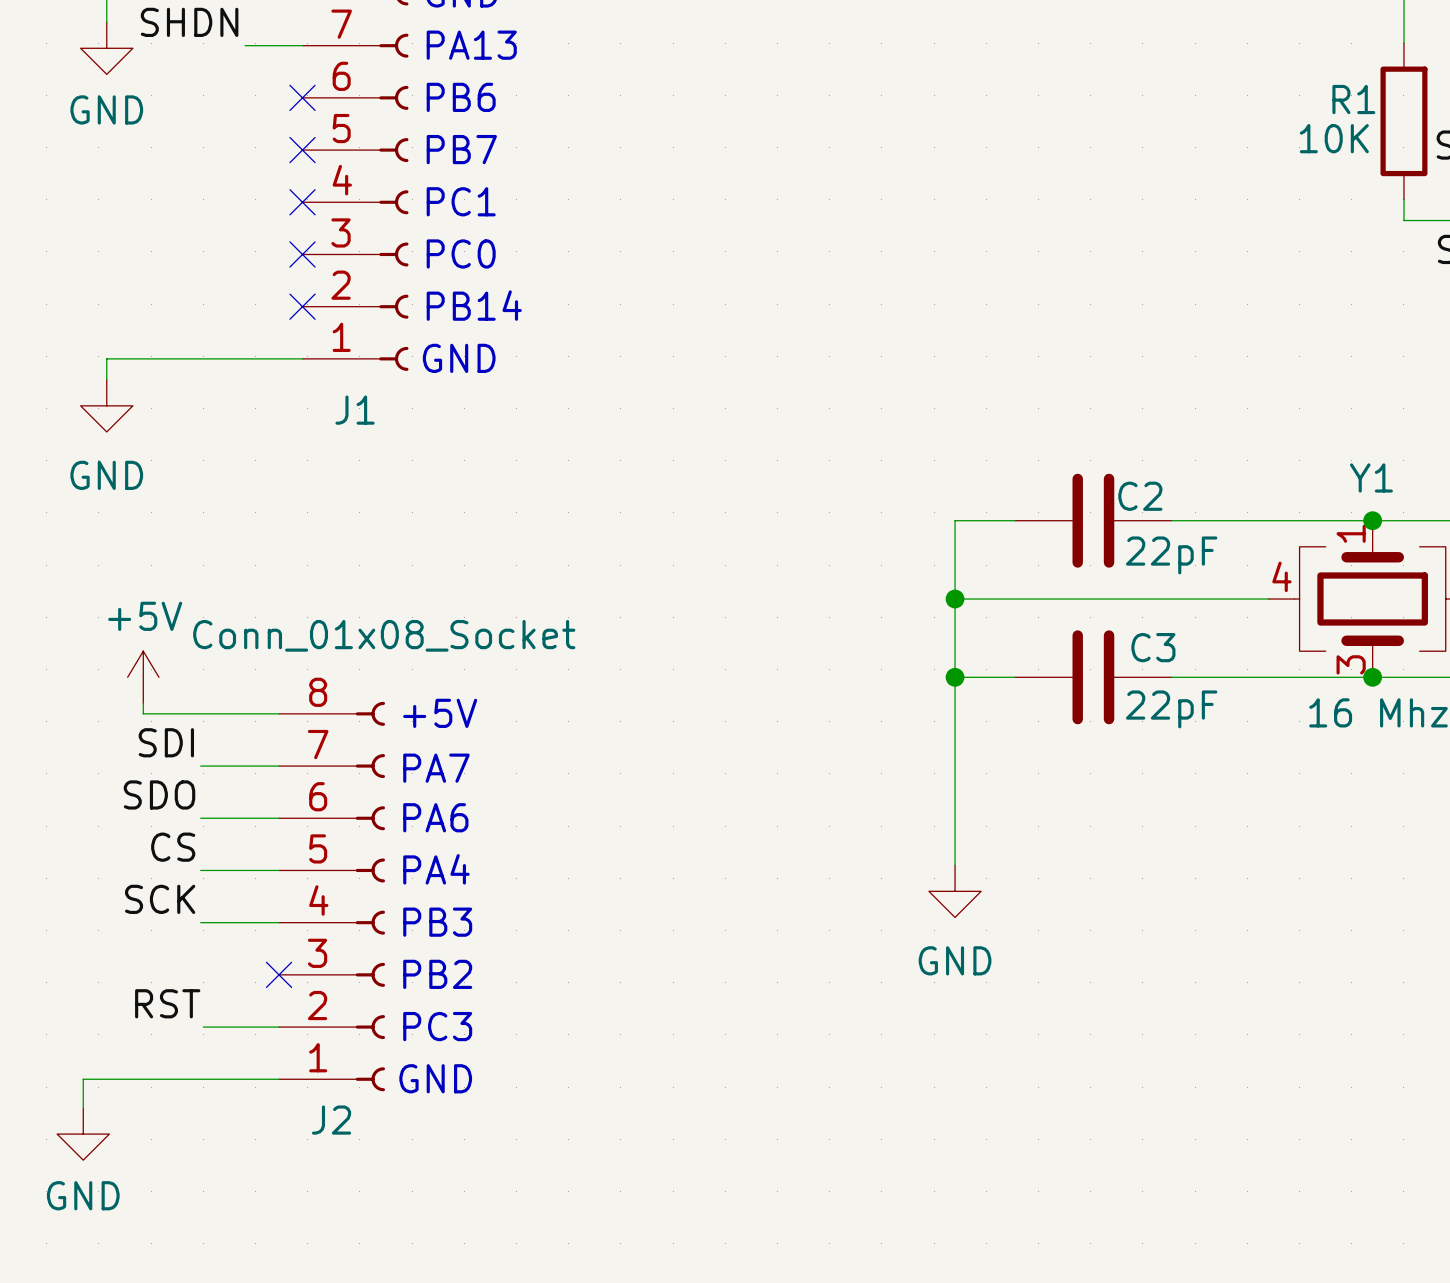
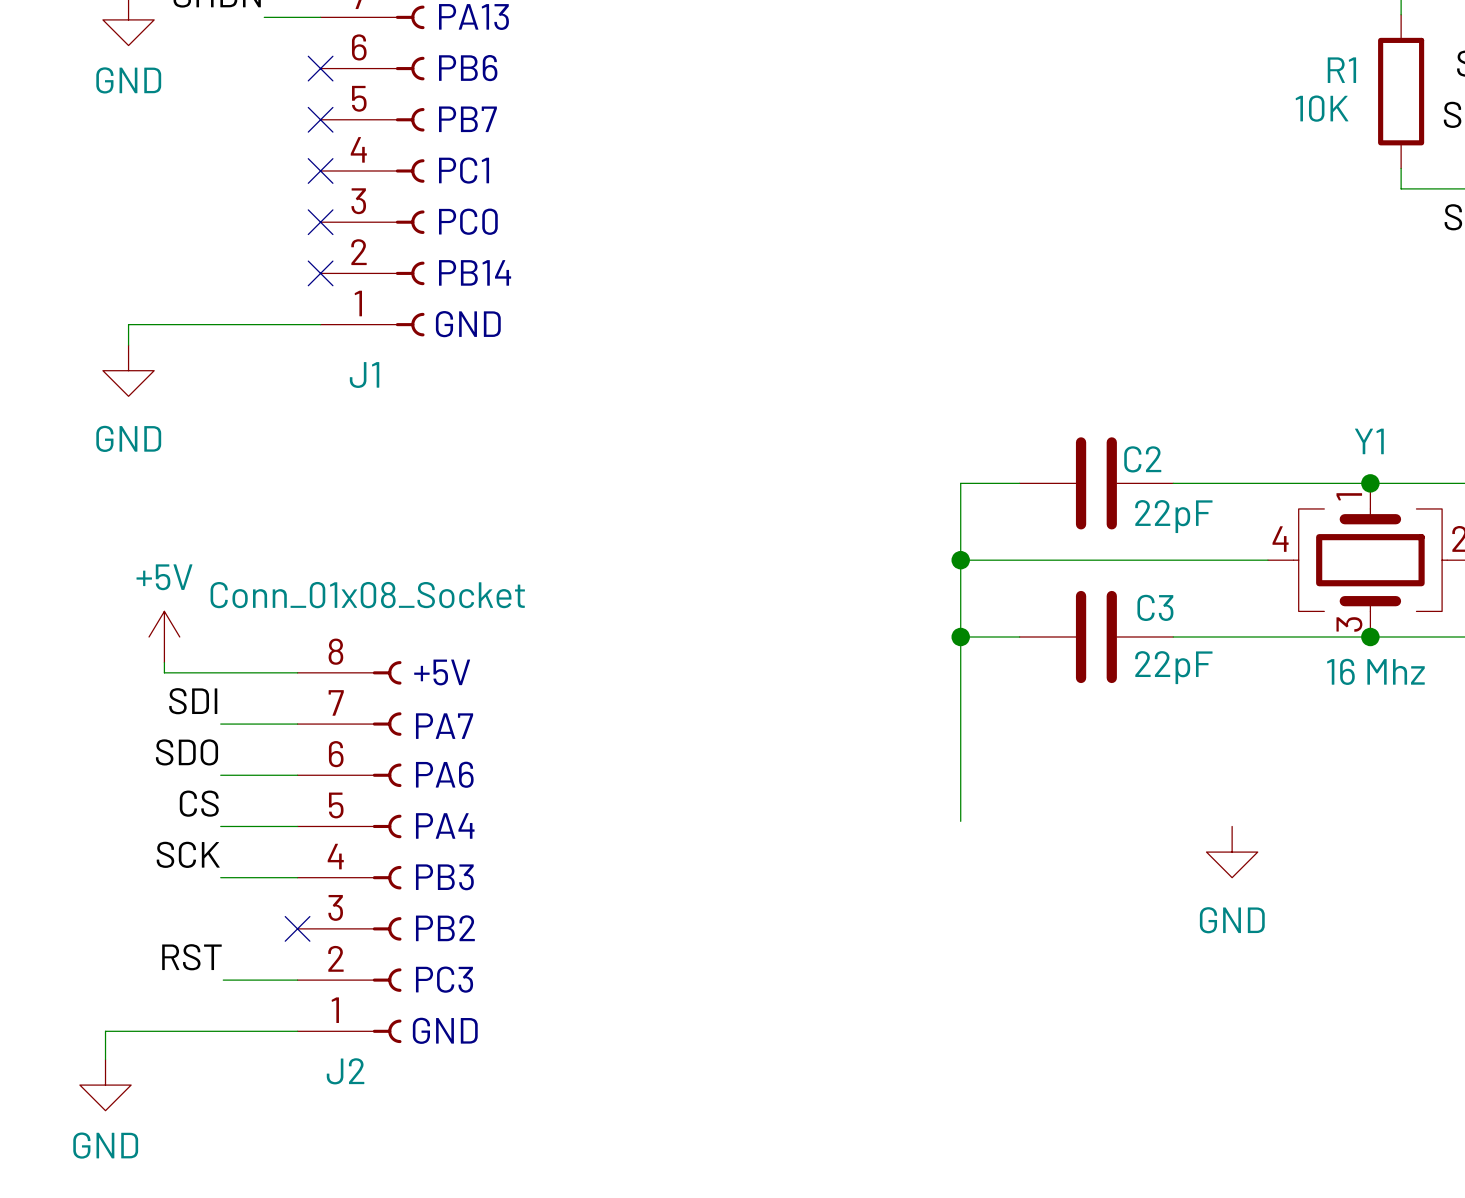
power symbol: GND (955, 891) -> none
power symbol: none -> GND (1232, 852)

